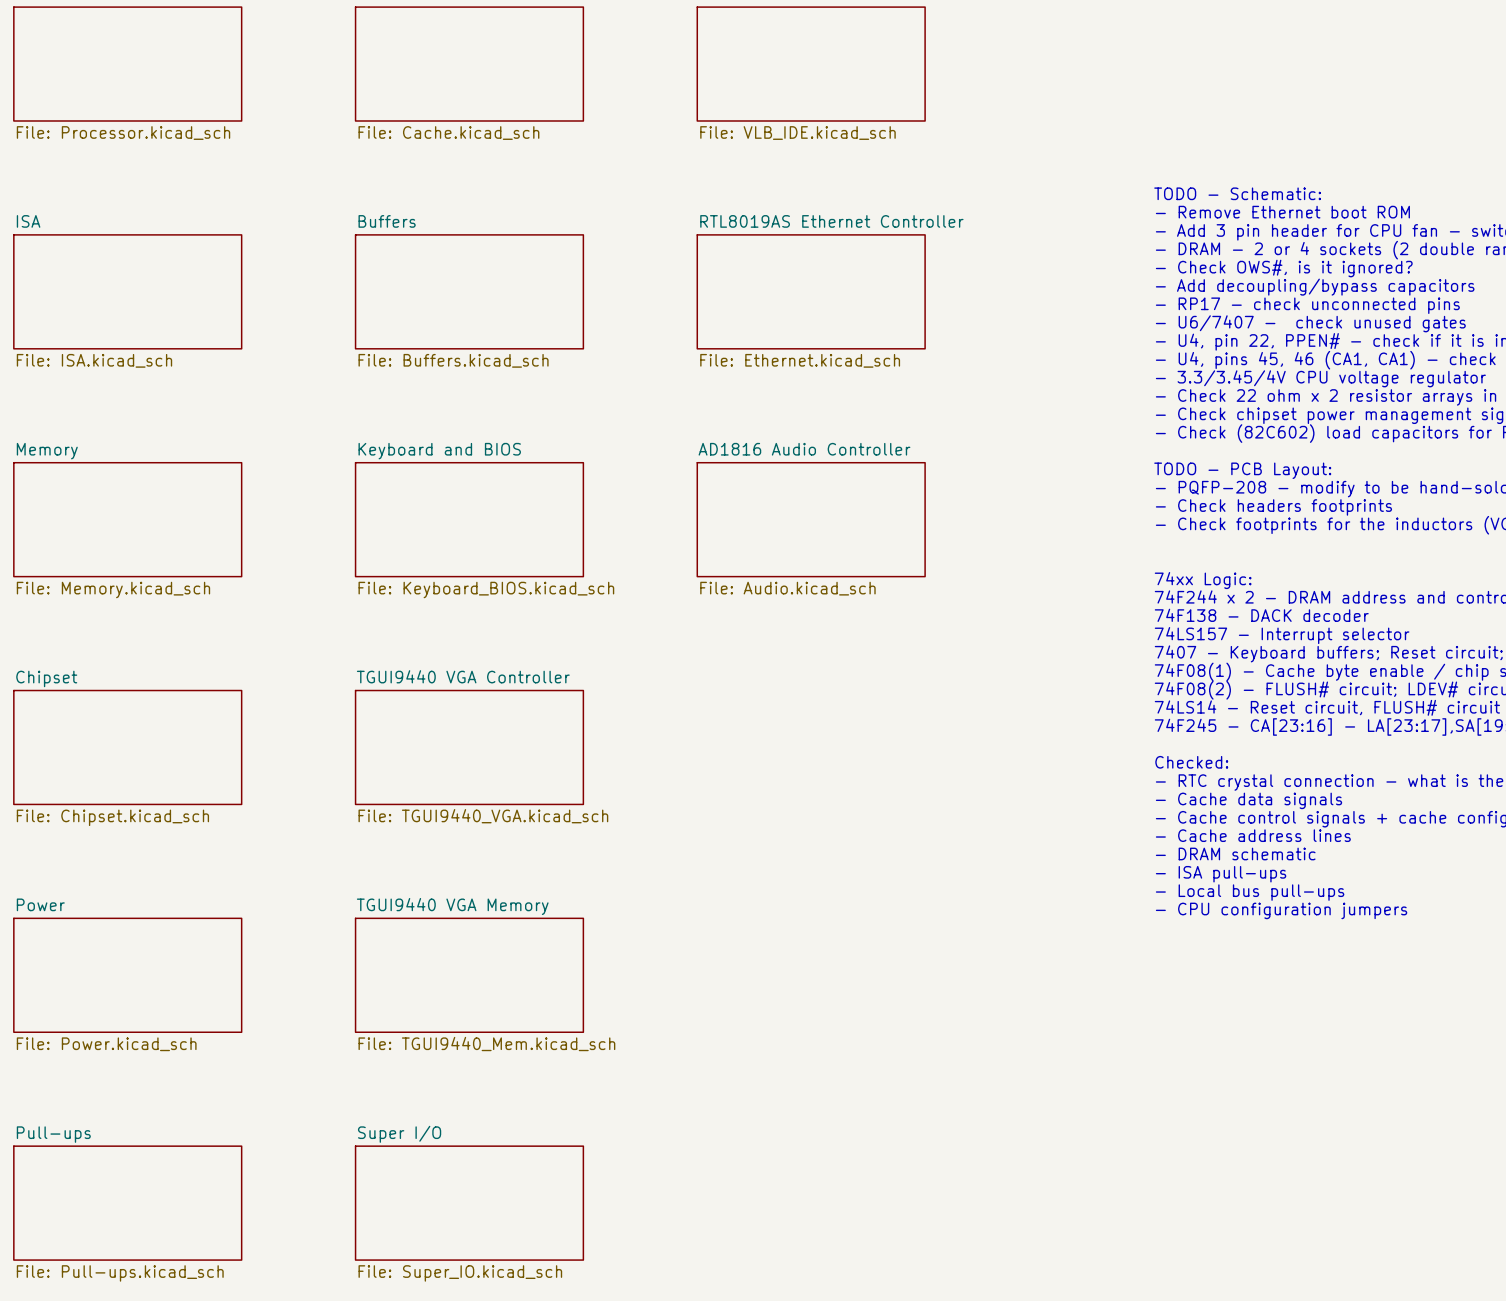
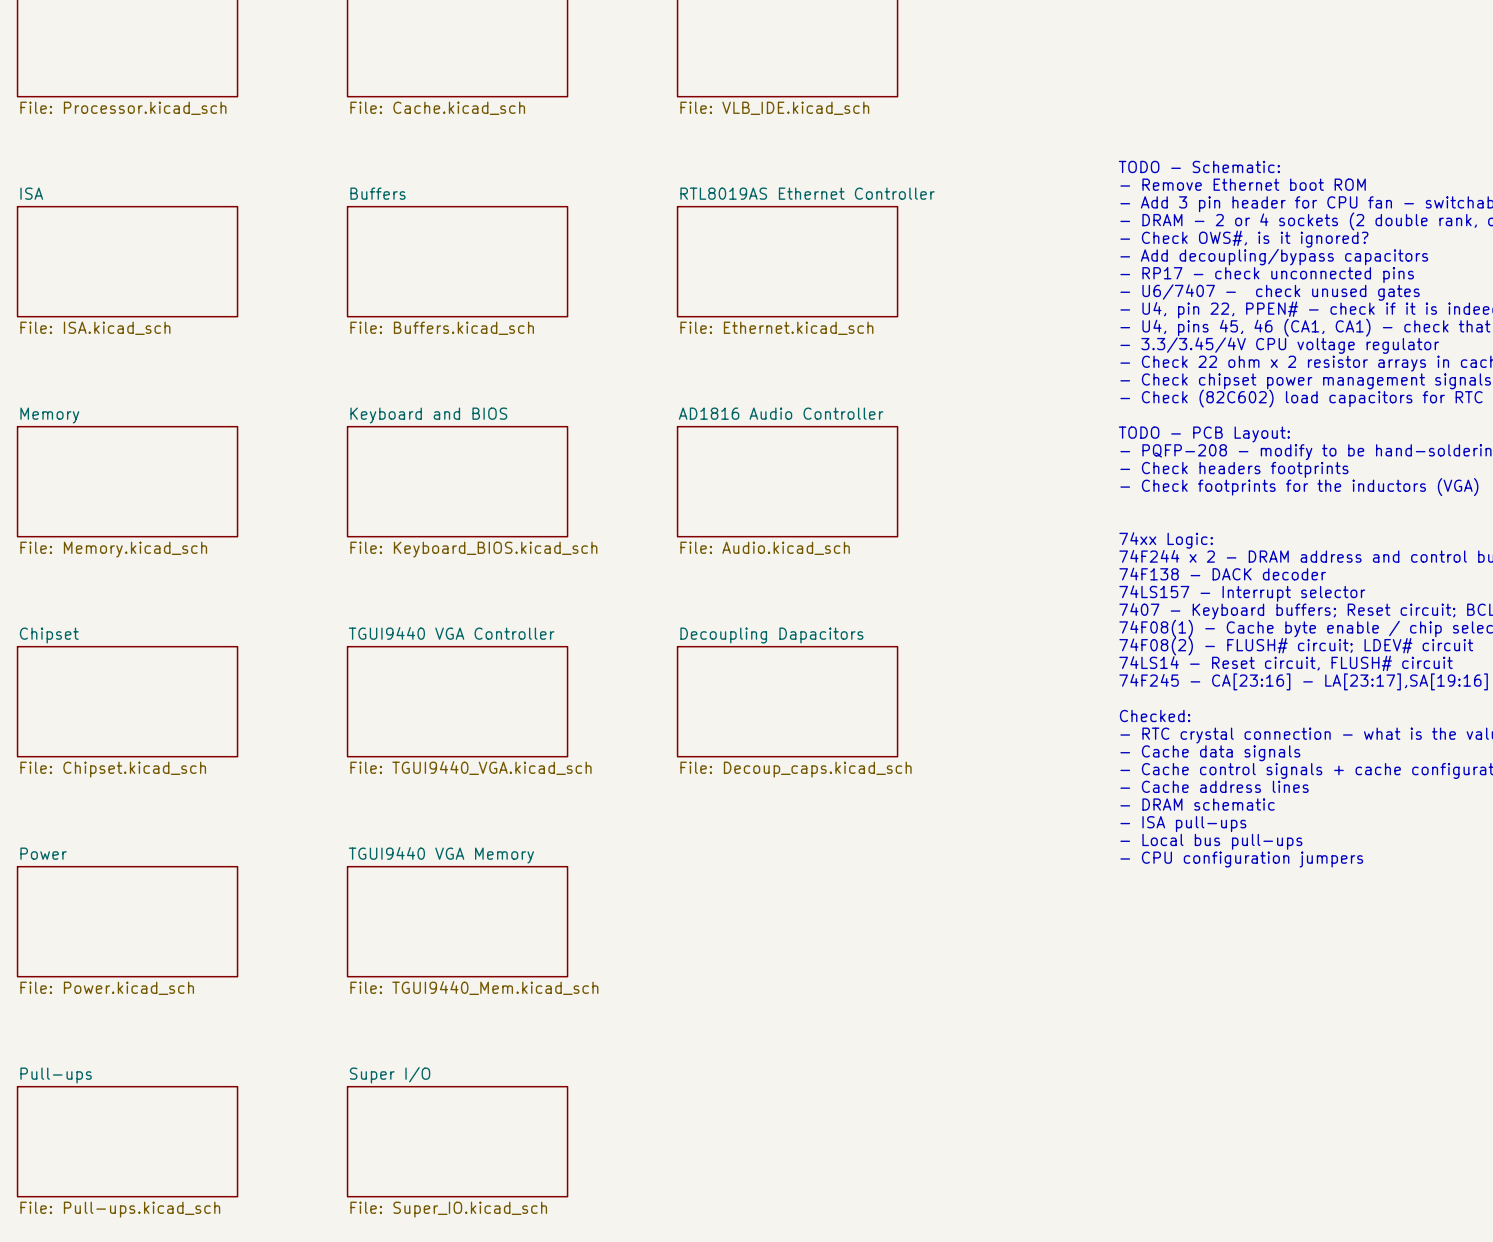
sheet Decoupling Dapacitors: none -> File: Decoup_caps.kicad_sch (787, 701)

